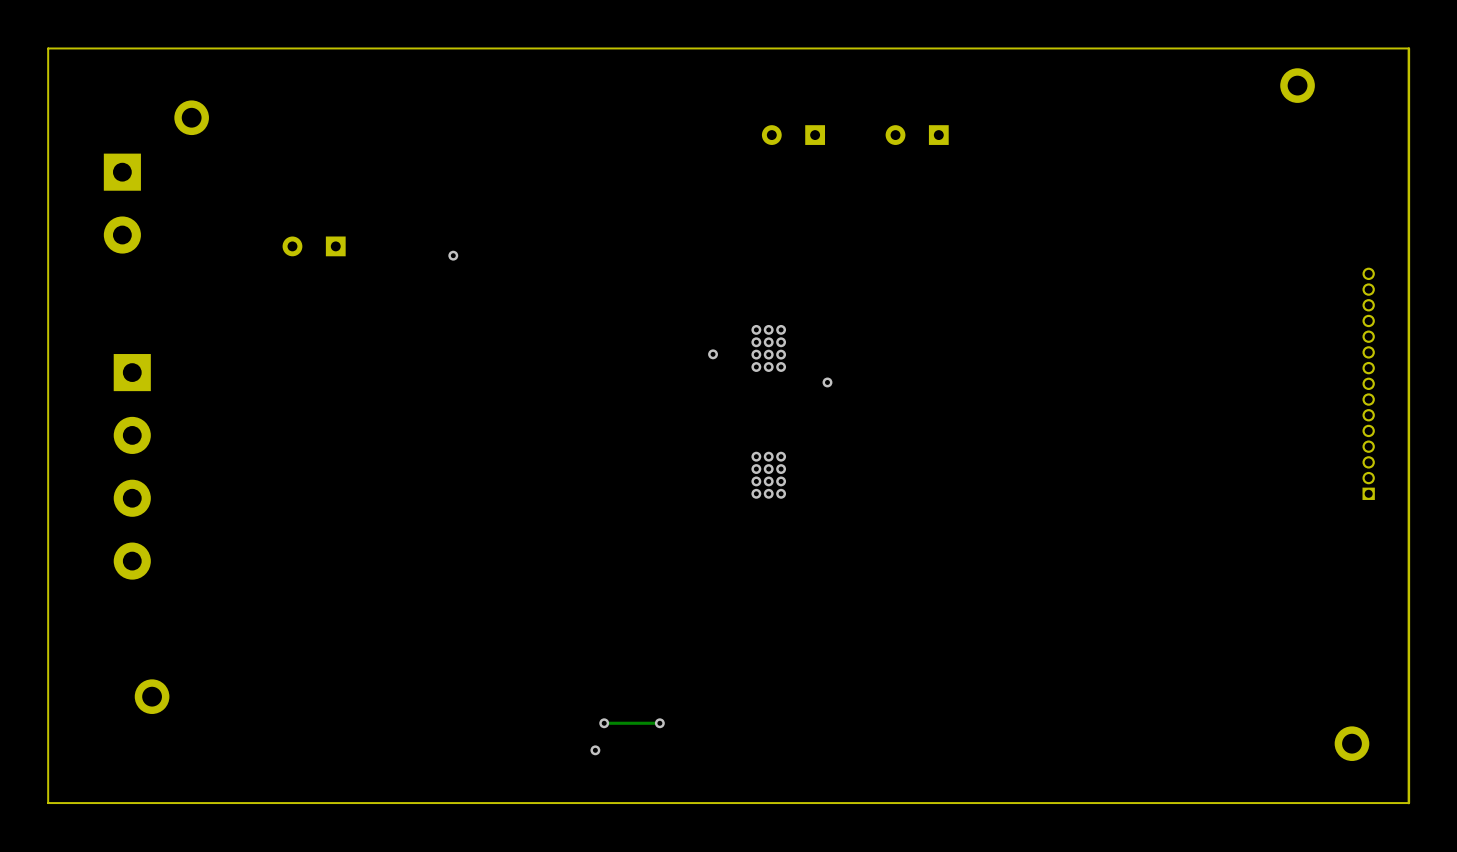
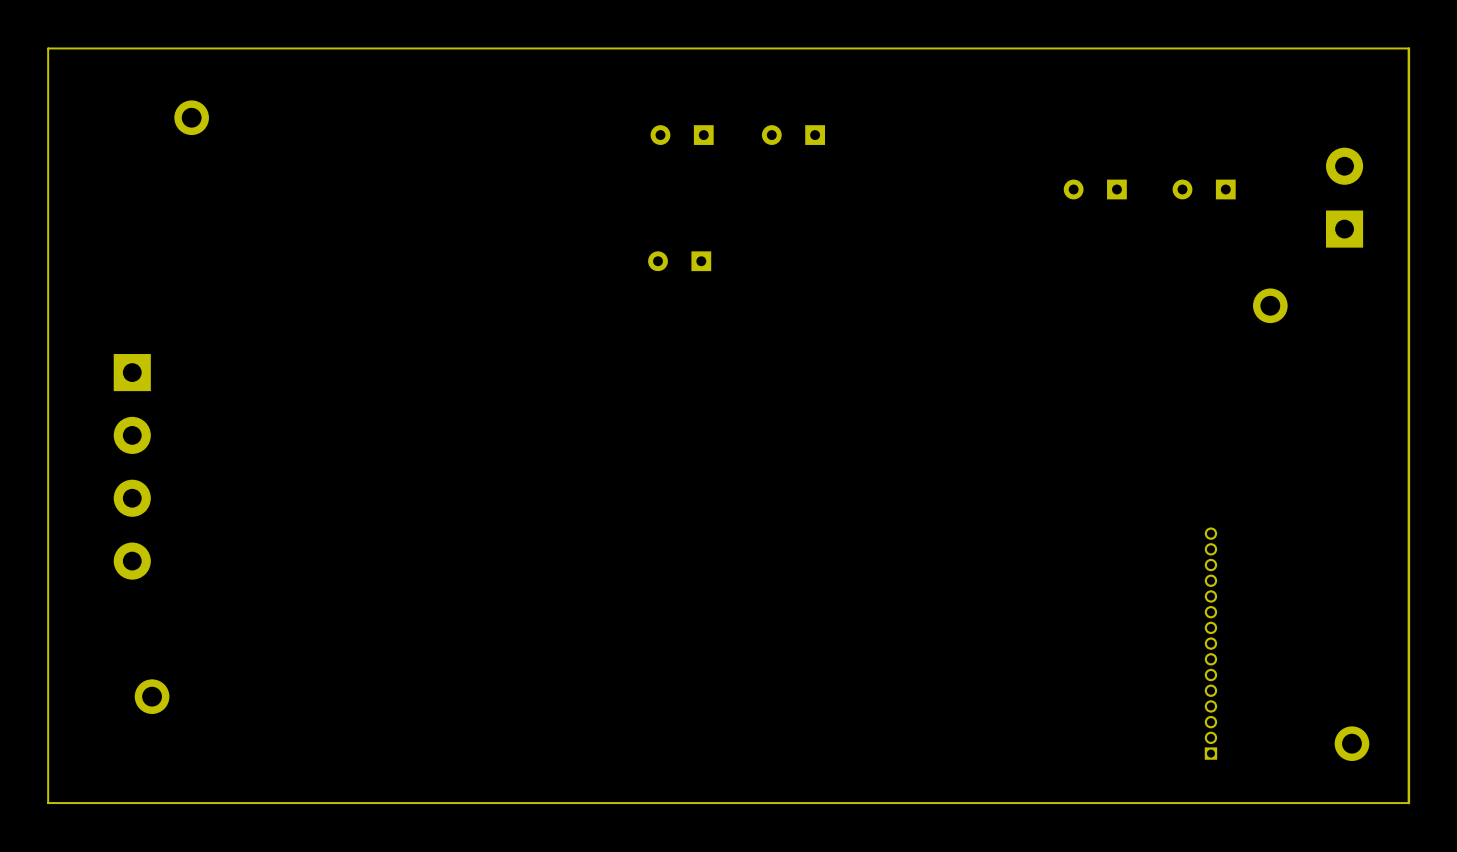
part position: (1297, 85) -> (1270, 305)
part: none -> (682, 135)
part: (917, 135) -> none
part: none -> (1095, 189)
part: none -> (1204, 189)
part: none -> (1344, 197)
part: (122, 203) -> none
part: (314, 246) -> none
via: (453, 255) -> none
part: none -> (679, 261)
via: (756, 329) -> none
via: (768, 329) -> none
via: (781, 329) -> none
via: (756, 342) -> none
via: (768, 342) -> none
via: (781, 342) -> none
via: (713, 354) -> none
via: (756, 354) -> none
via: (768, 354) -> none
via: (781, 354) -> none
via: (756, 367) -> none
via: (768, 367) -> none
via: (781, 367) -> none
via: (827, 382) -> none
part position: (1368, 383) -> (1210, 643)
via: (756, 456) -> none
via: (768, 456) -> none
via: (781, 456) -> none
via: (756, 469) -> none
via: (768, 469) -> none
via: (781, 469) -> none
via: (756, 481) -> none
via: (768, 481) -> none
via: (781, 481) -> none
via: (756, 493) -> none
via: (768, 493) -> none
via: (781, 493) -> none
via: (604, 723) -> none
track: (659, 723) (604, 723) -> none
via: (659, 723) -> none
via: (595, 750) -> none

